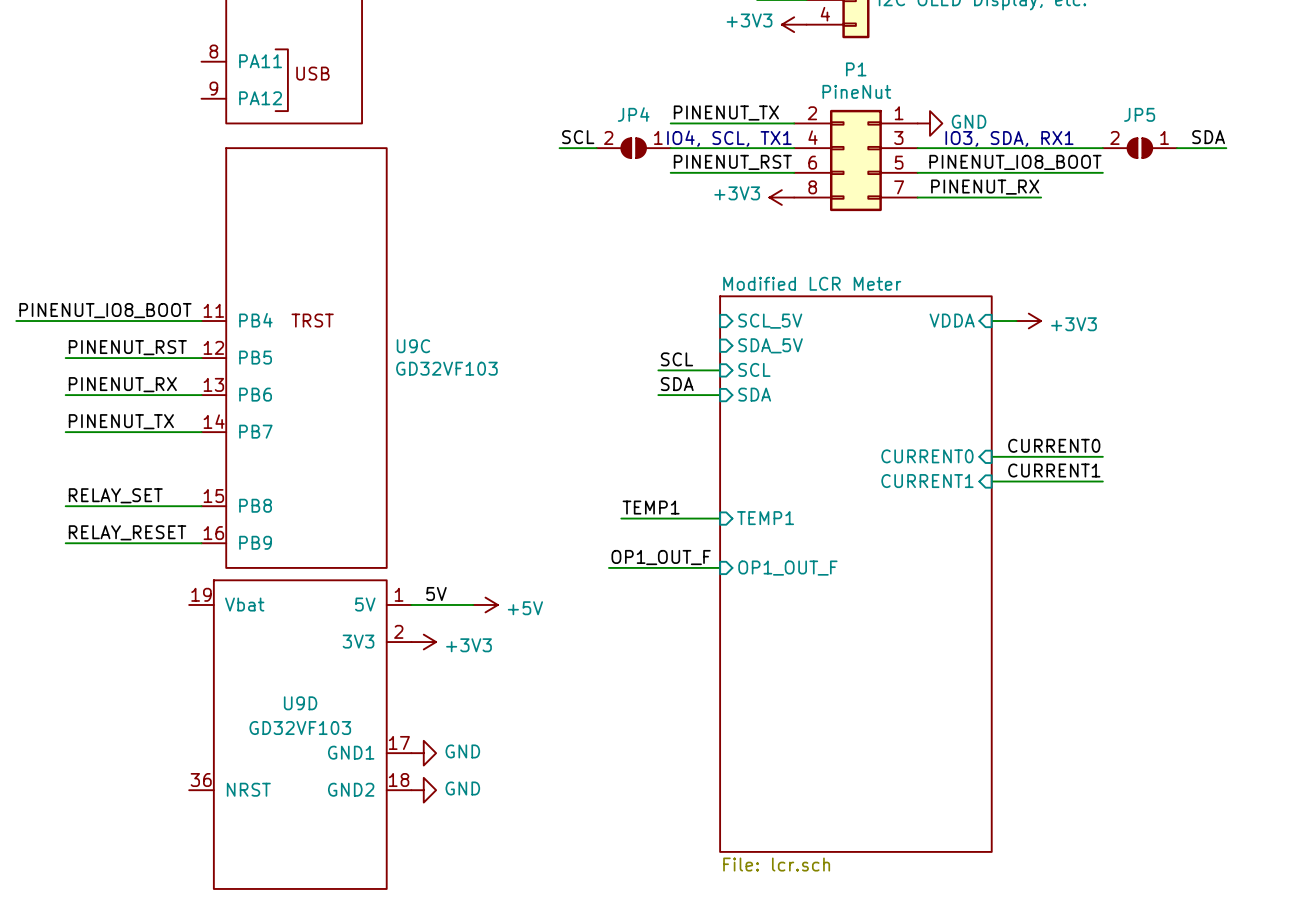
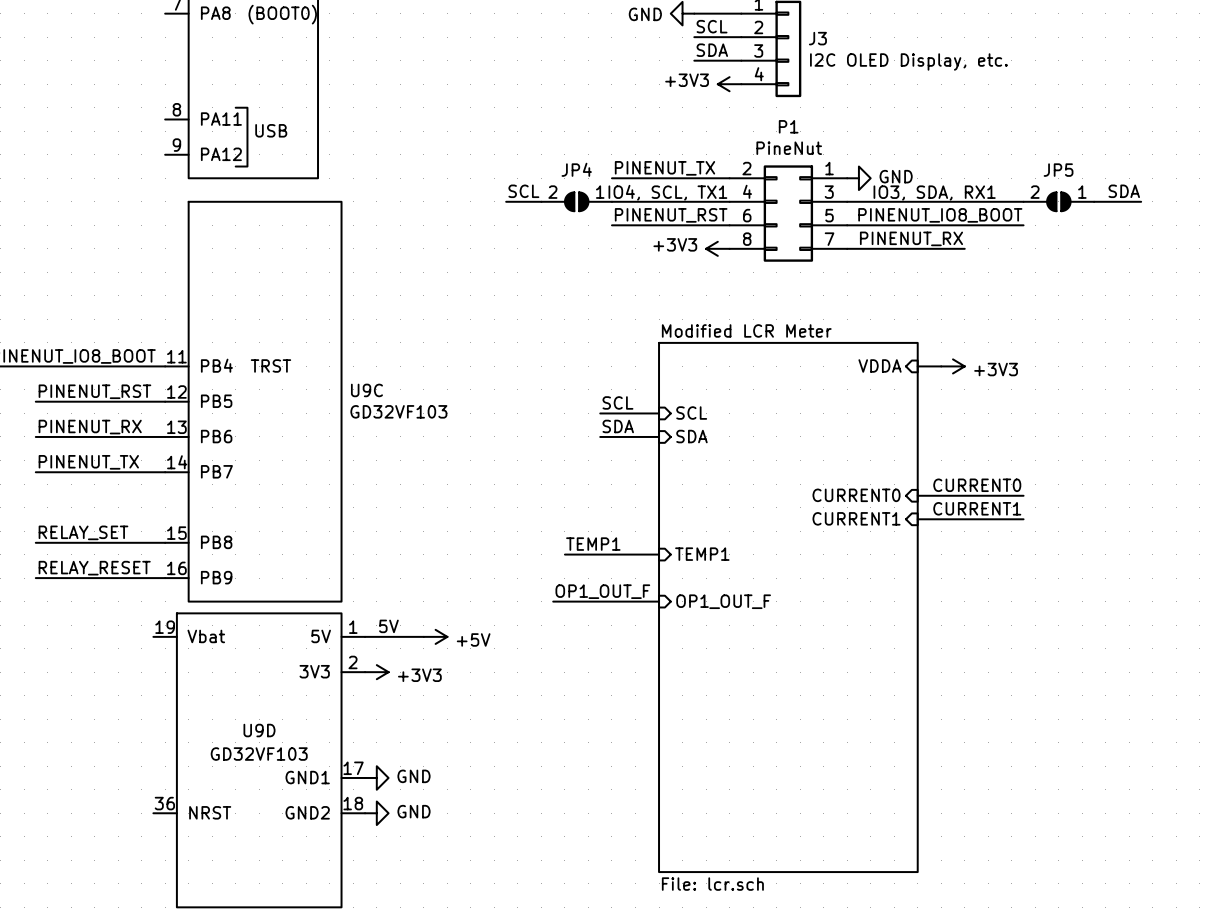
sheet pin: SCL_5V (770, 321) -> none
sheet pin: SDA_5V (770, 345) -> none

